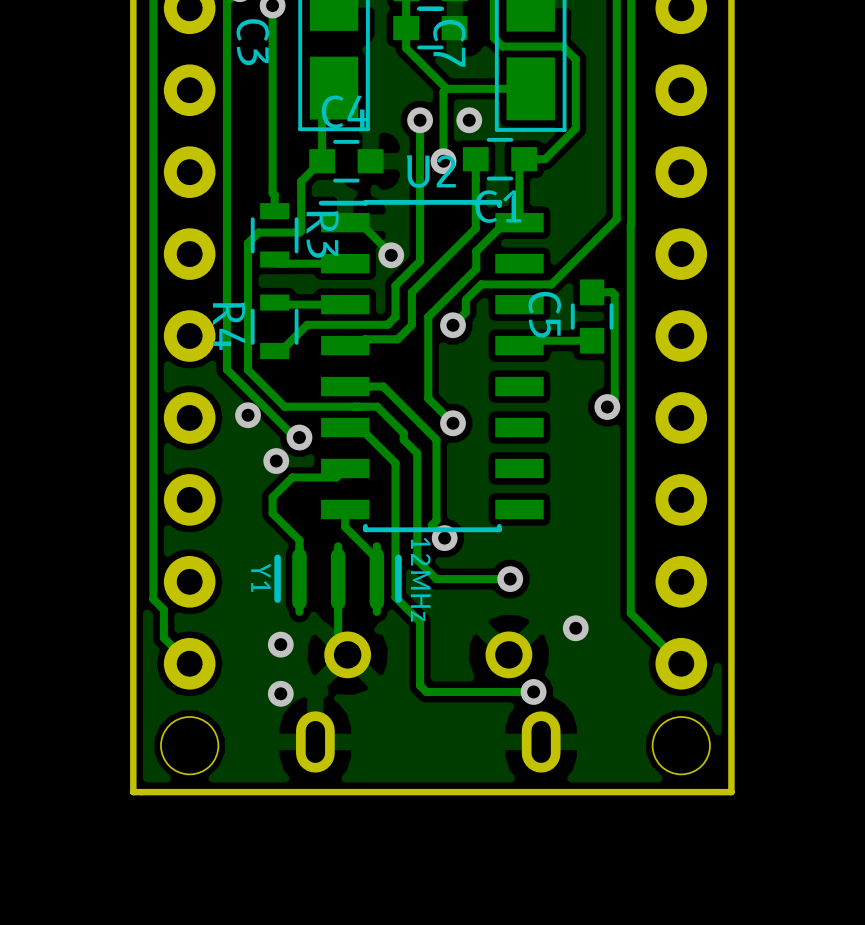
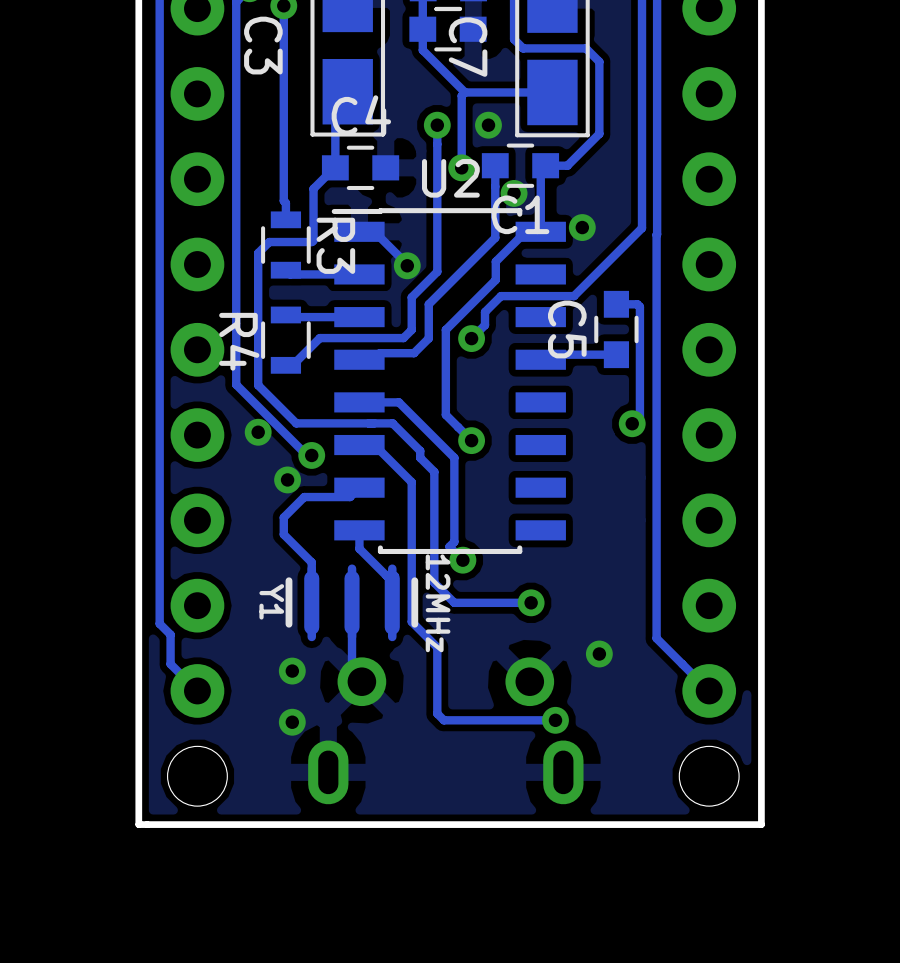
via: none -> (514, 193)
via: none -> (582, 227)

